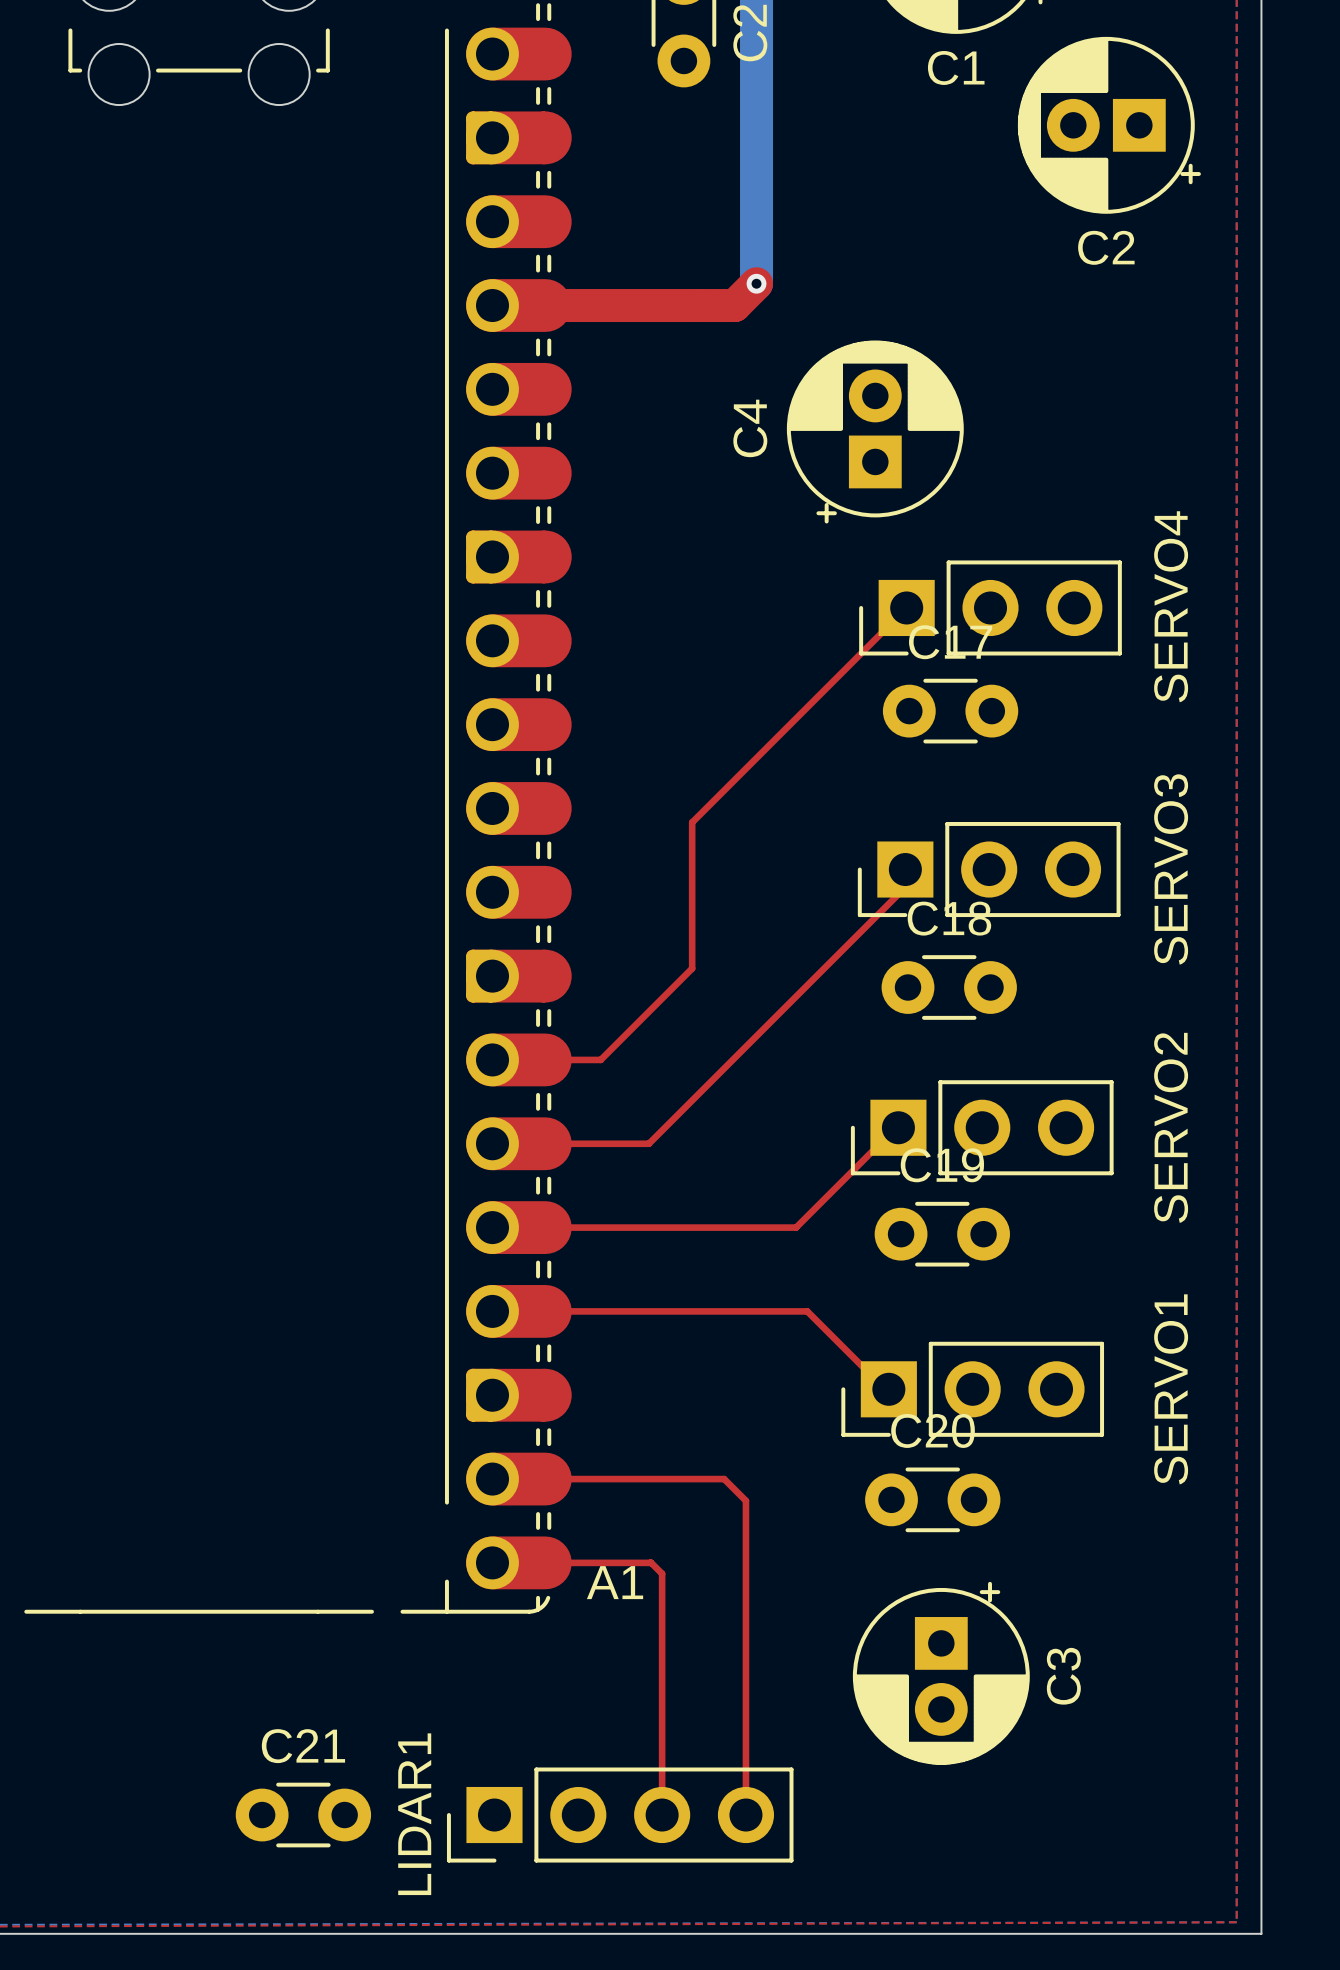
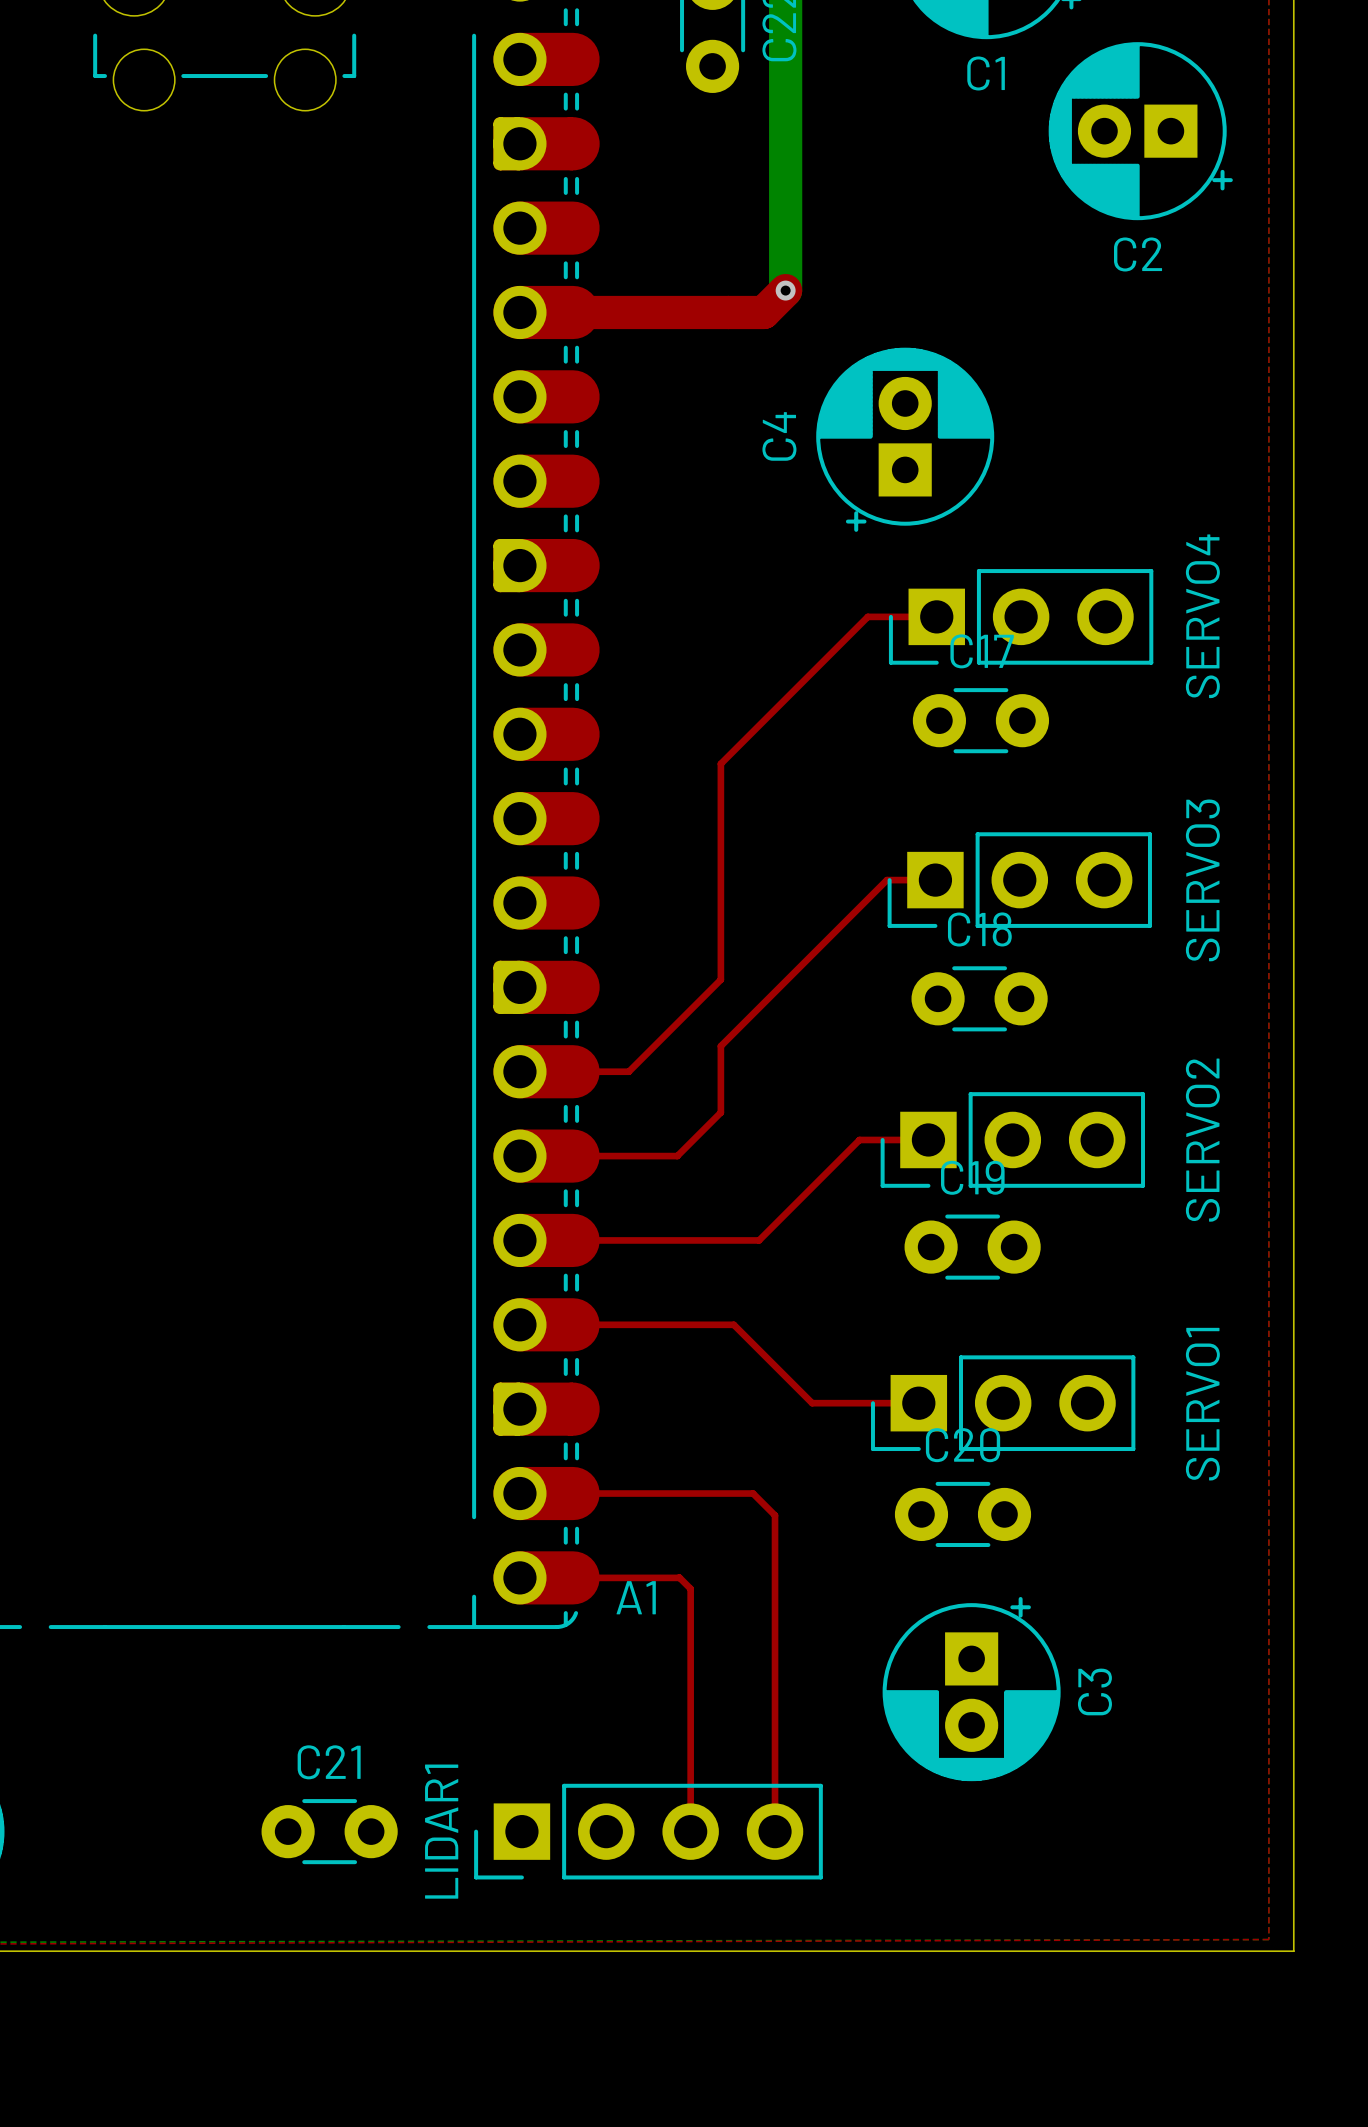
top track: (906, 607) (692, 822) -> (936, 616) (867, 616) (720, 763) (720, 832)
top track: (905, 869) (905, 887) (692, 1100) -> (935, 880) (886, 880) (720, 1046) (720, 1112)
top track: (895, 1127) (796, 1227) (730, 1227) -> (925, 1139) (859, 1139) (759, 1240)
top track: (705, 1311) (807, 1311) (885, 1389) -> (733, 1324) (812, 1403) (915, 1403)

